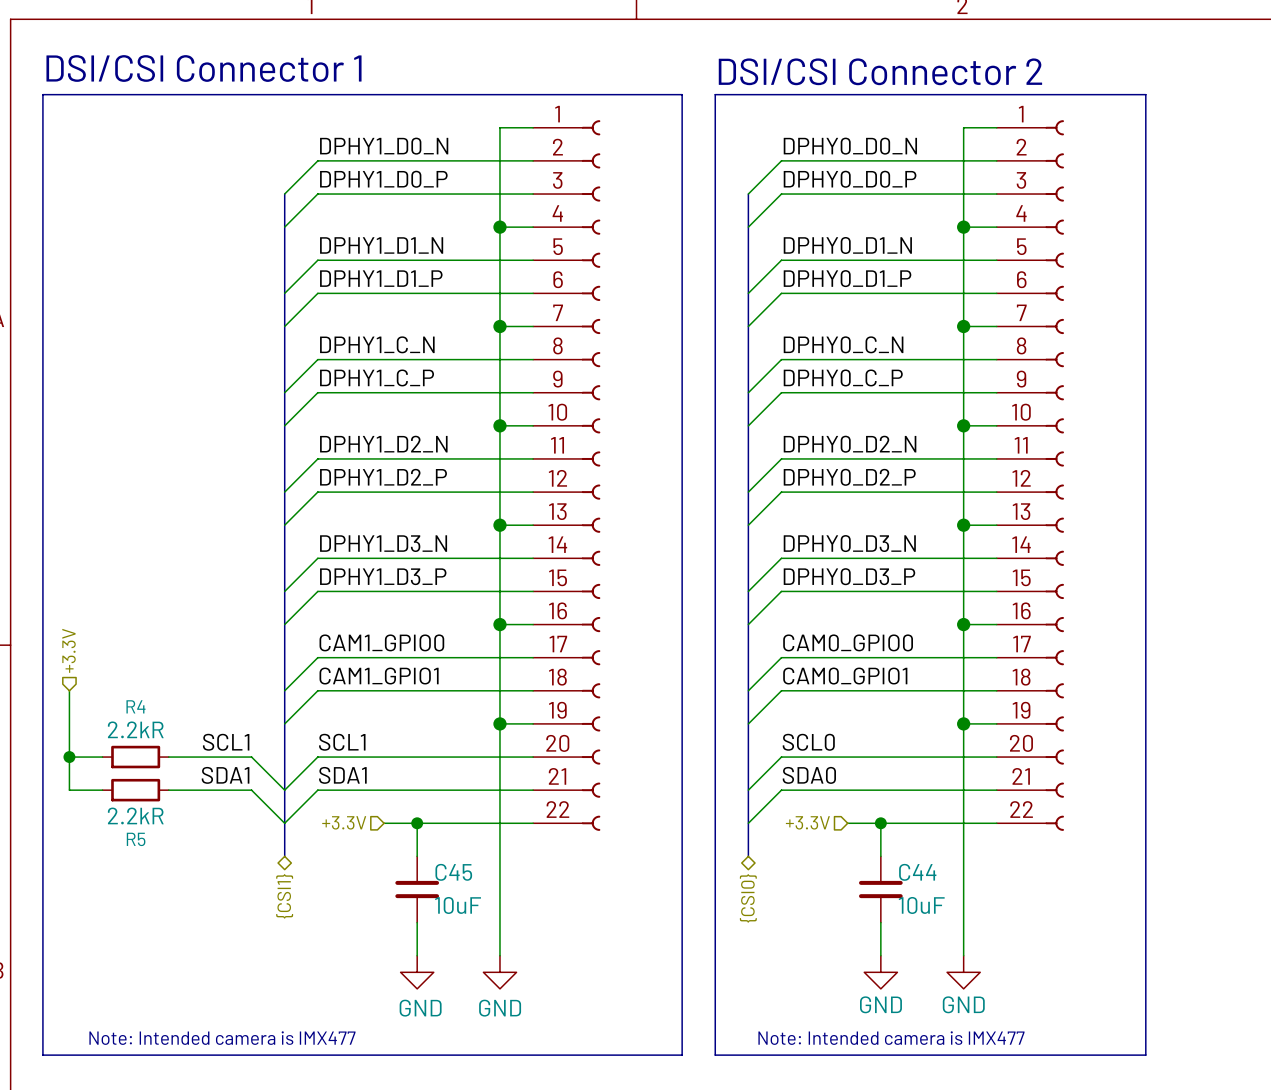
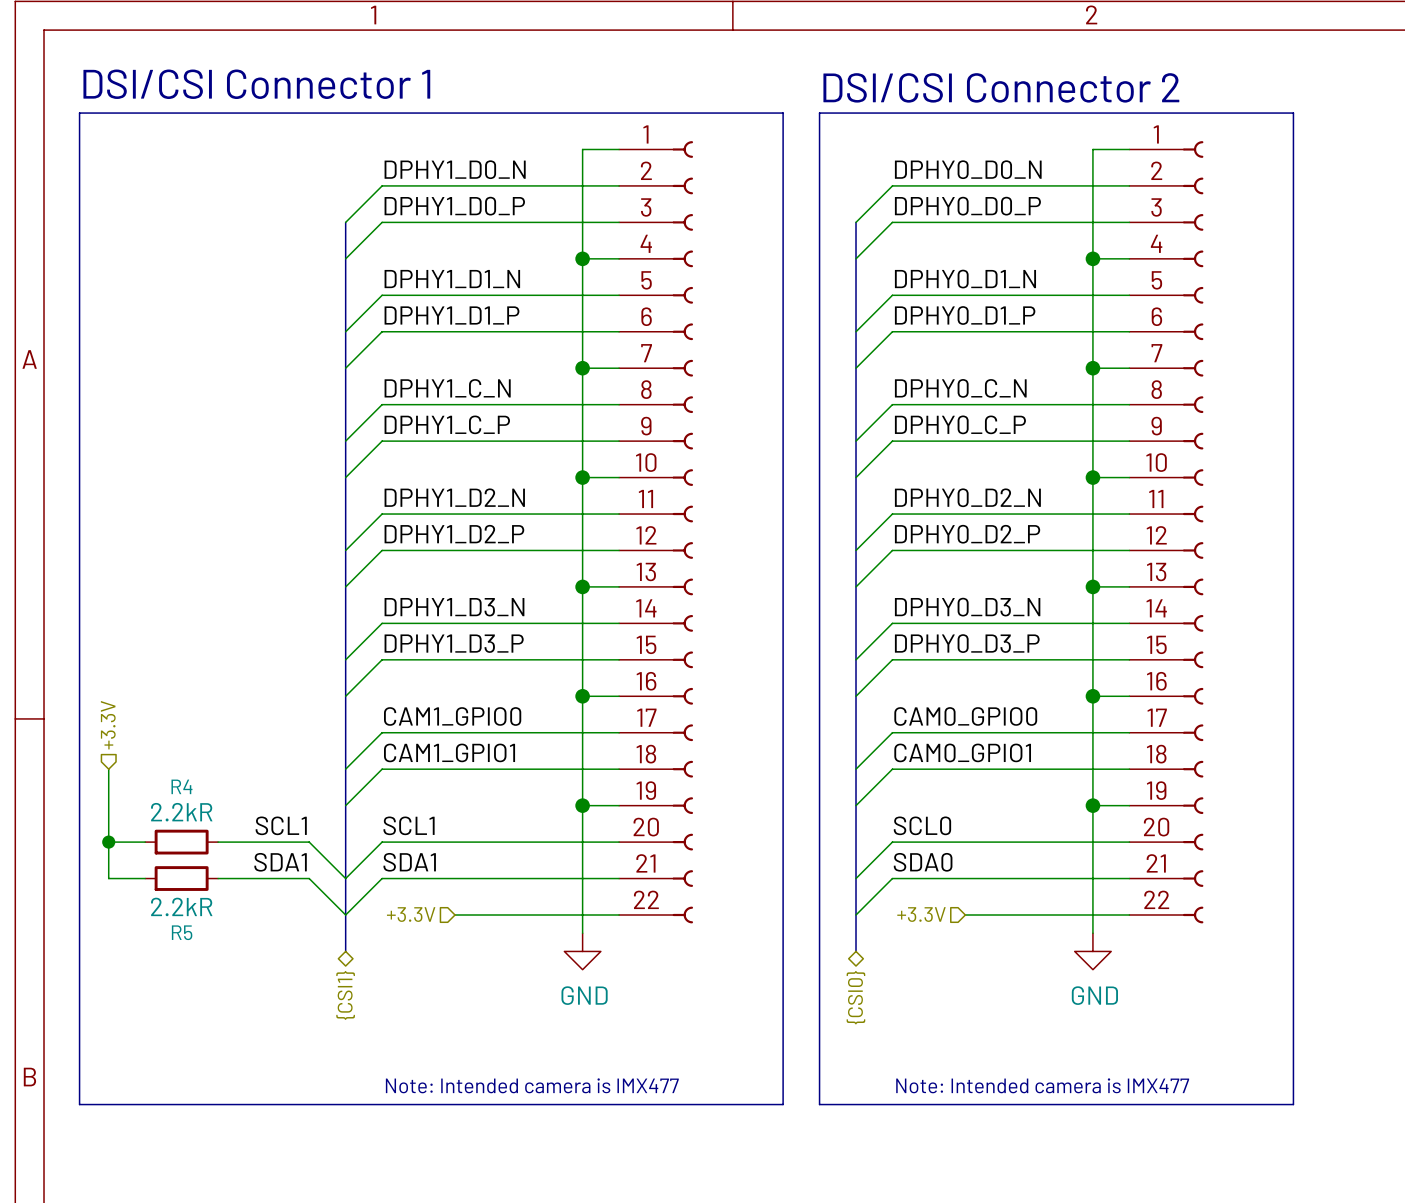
wire: (417, 823) (417, 856) -> none
junction: (417, 823) -> none
wire: (880, 823) (880, 856) -> none
junction: (880, 823) -> none
wire: (499, 839) (499, 955) -> none
wire: (963, 839) (963, 955) -> none
power symbol: none -> GND (582, 951)
power symbol: none -> GND (1092, 951)
C45: 10uF (417, 889) -> none
C44: 10uF (880, 889) -> none
wire: (417, 922) (417, 955) -> none
wire: (880, 922) (880, 955) -> none
power symbol: GND (417, 972) -> none
power symbol: GND (499, 972) -> none
power symbol: GND (880, 972) -> none
power symbol: GND (963, 972) -> none
text: none -> Note: Intended camera is IMX477 (532, 1085)
line: (42, 995) (42, 1055) (682, 1055) (682, 995) -> (79, 1104) (783, 1104)
line: (715, 995) (715, 1055) (1145, 1055) (1145, 995) -> (819, 1104) (1293, 1104)
text: Note: Intended camera is IMX477 (222, 1038) -> none
text position: Note: Intended camera is IMX477 (891, 1038) -> Note: Intended camera is IMX477 (1042, 1085)

